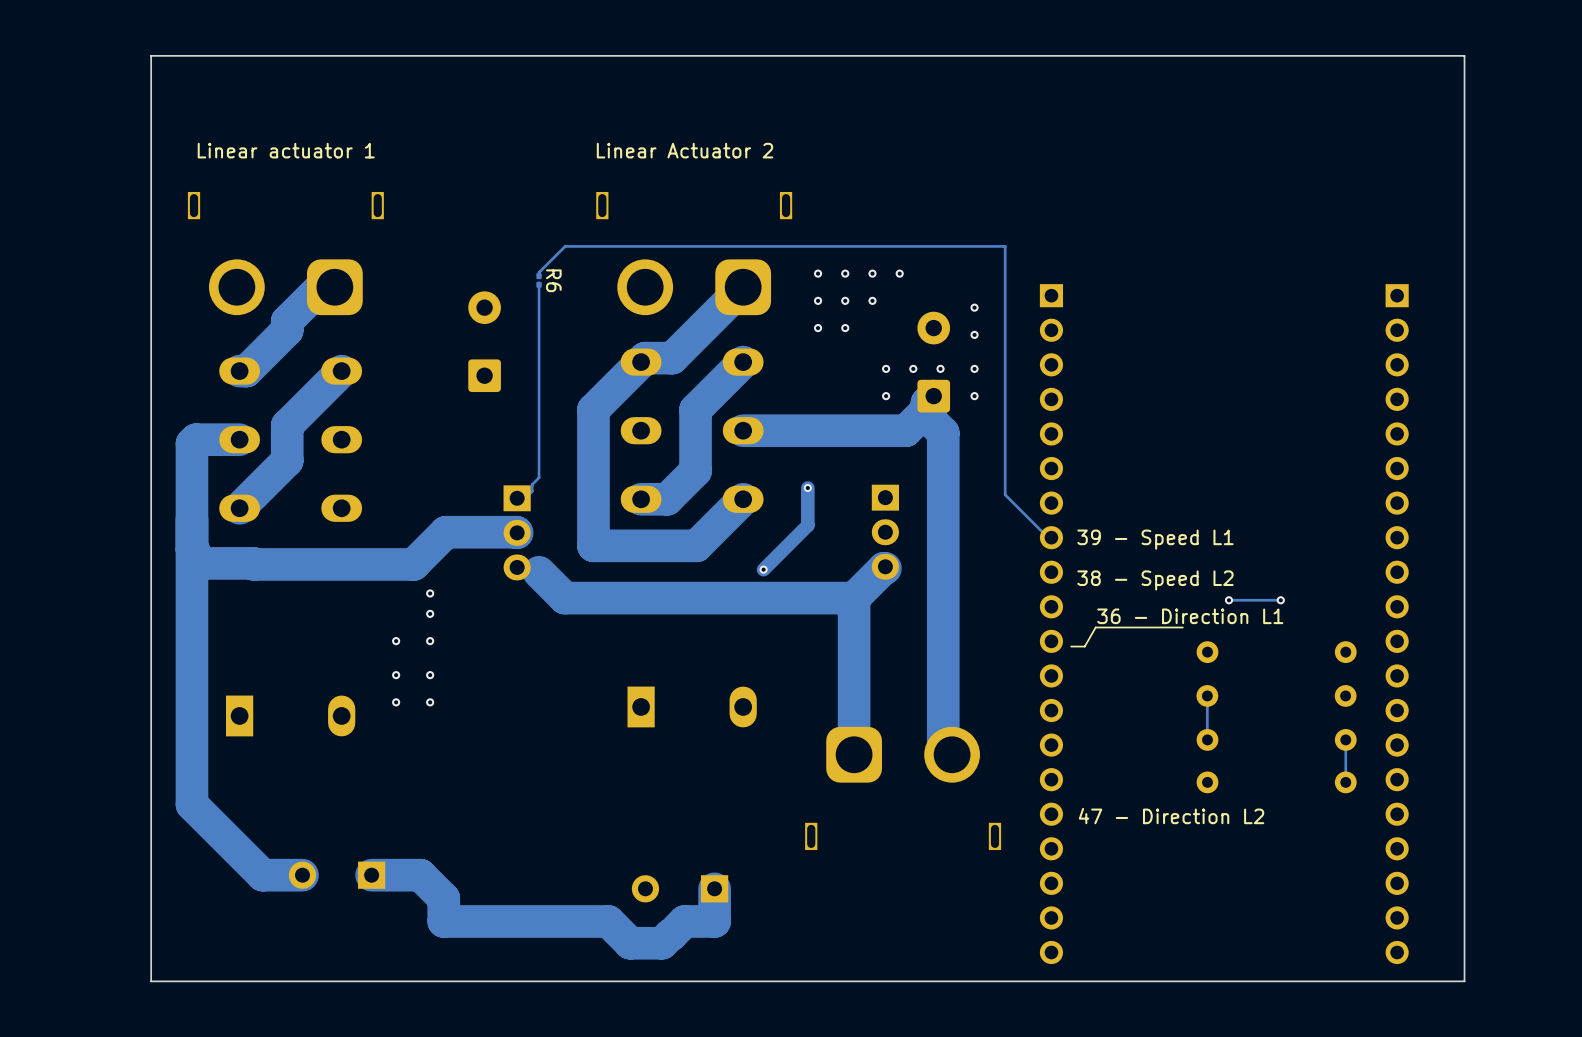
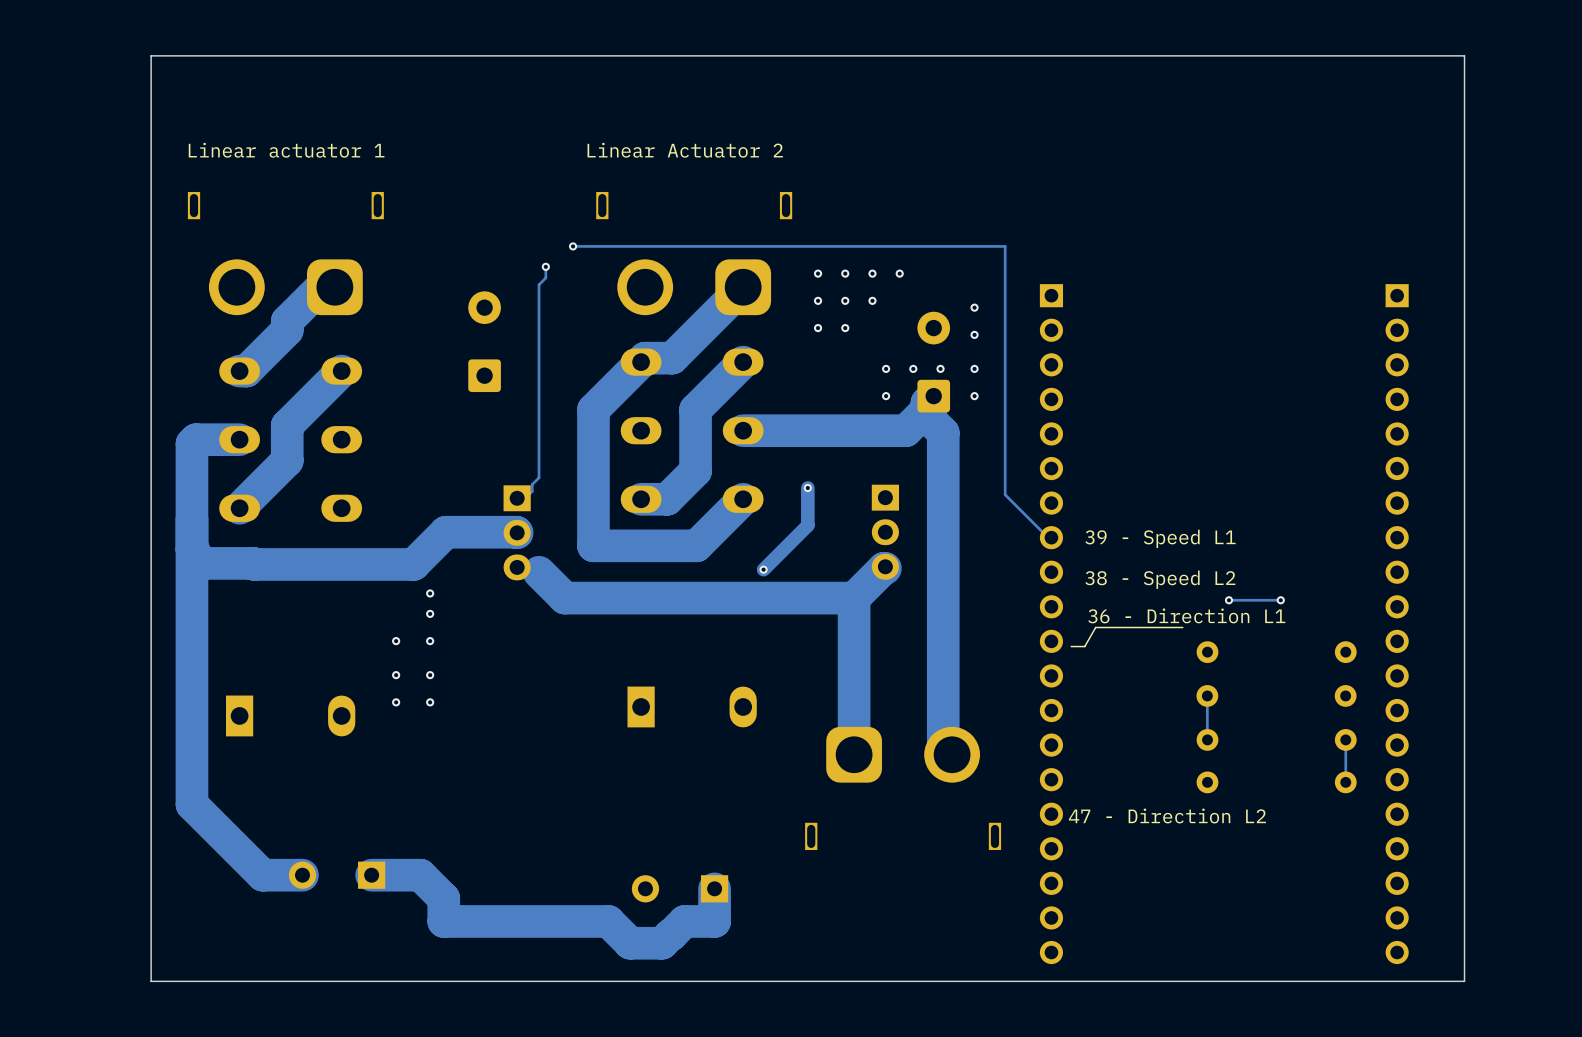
track: (573, 246) (565, 246) (539, 273) -> none
via: none -> (573, 246)
track: none -> (545, 266) (545, 277) (539, 284)
via: none -> (545, 266)
R6: (539, 280) -> none

